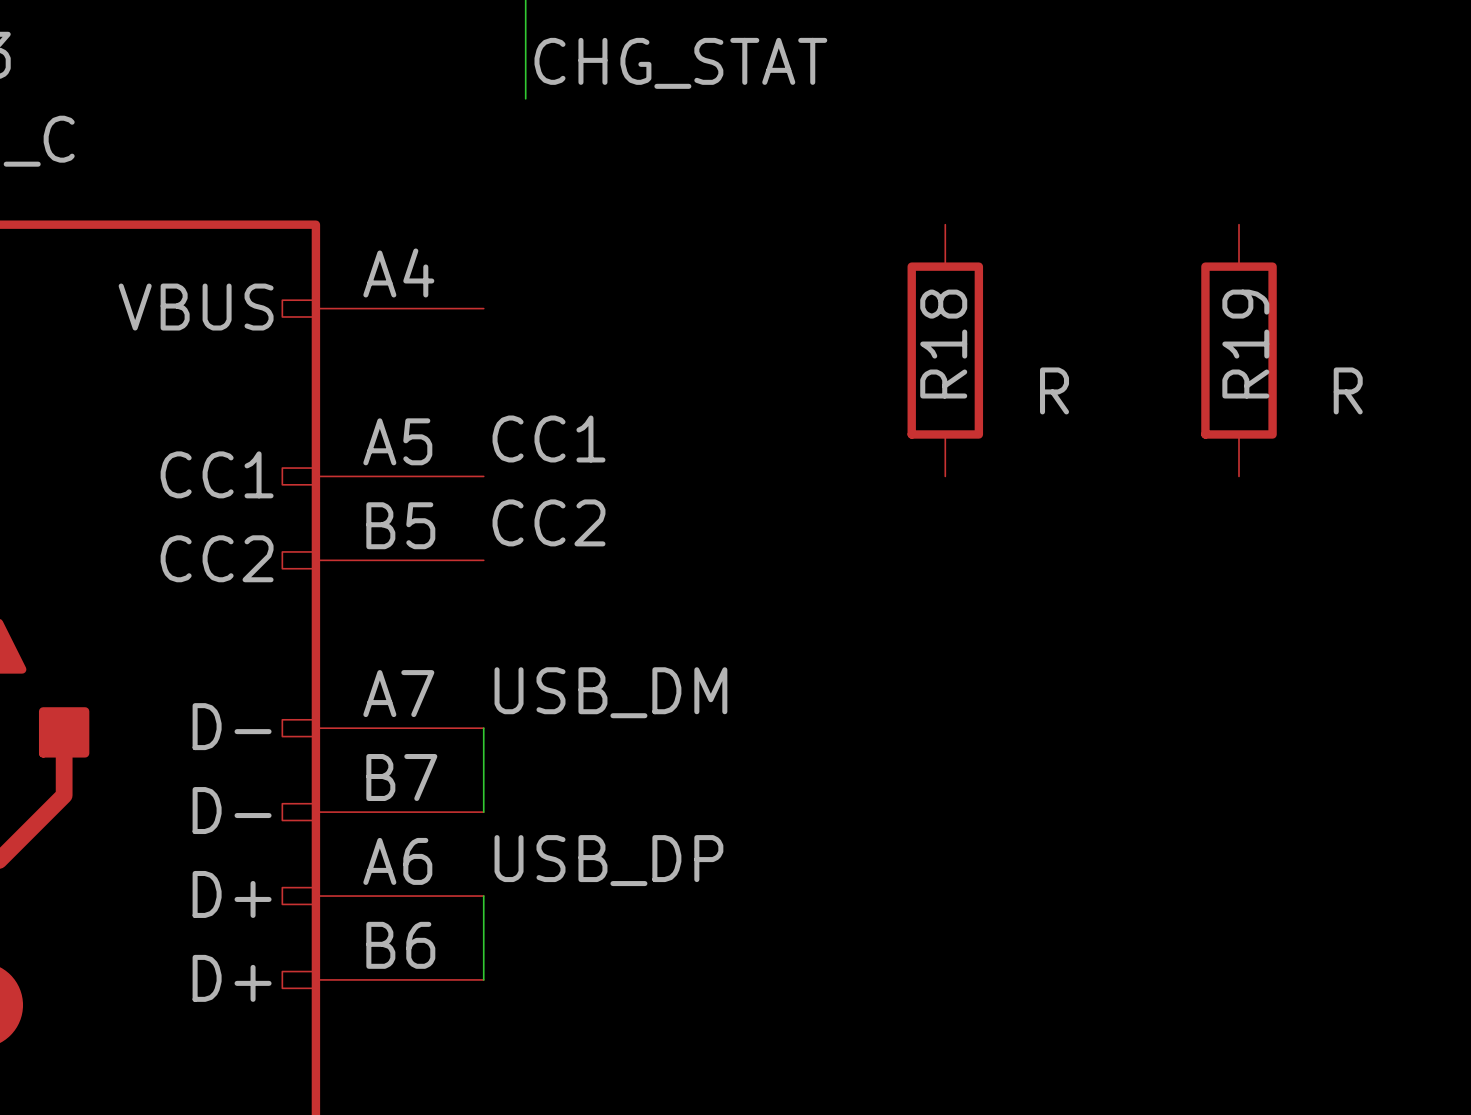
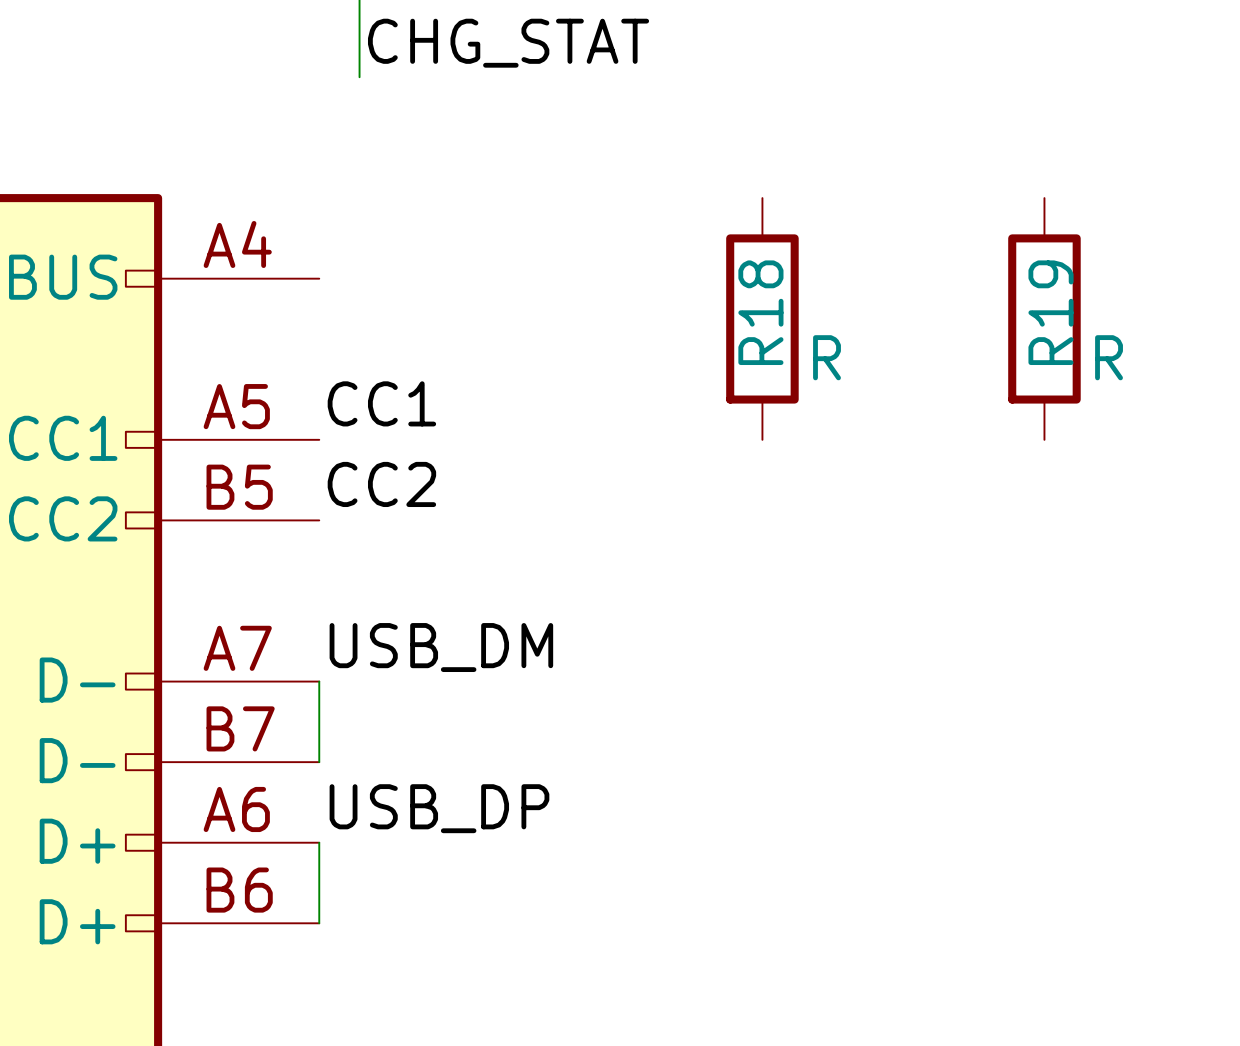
R18 value position: R (1054, 390) -> R (827, 357)
R19 value position: R (1348, 390) -> R (1109, 357)

